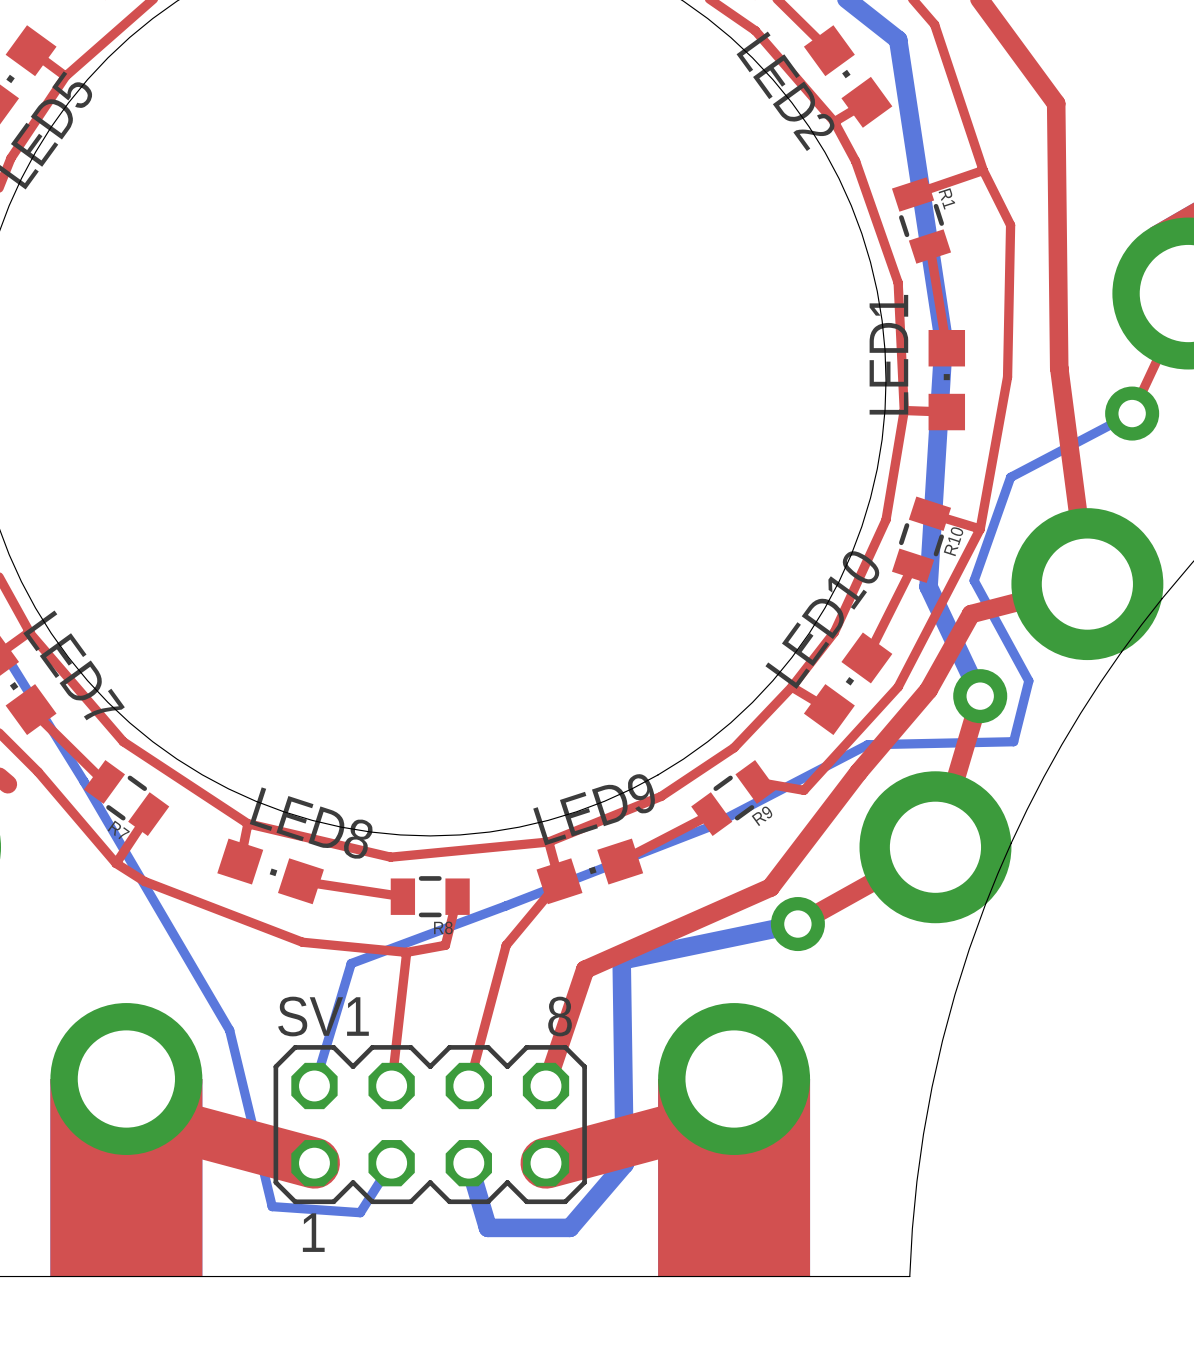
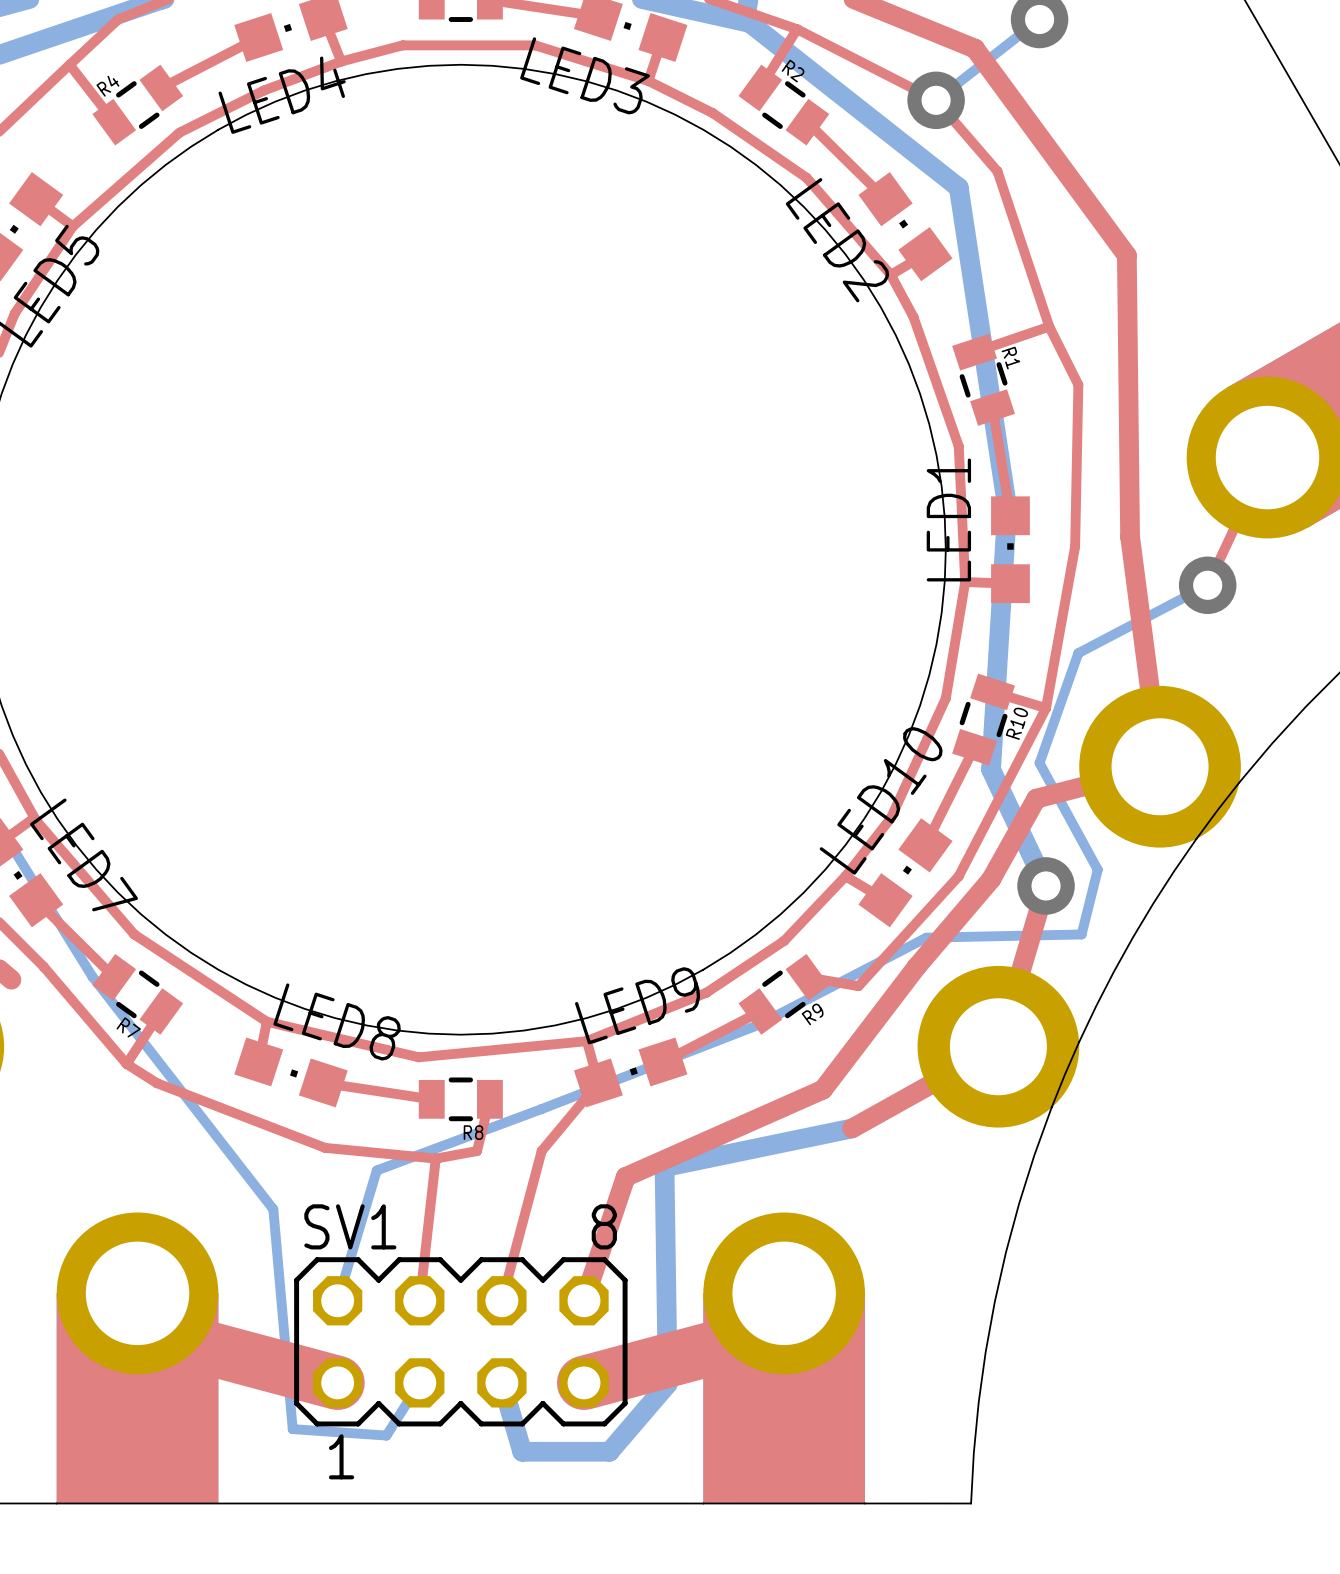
bottom track: (83, 781) (229, 1030) (272, 1206) -> (92, 976) (273, 1209) (292, 1429)
via: (797, 924) -> none

